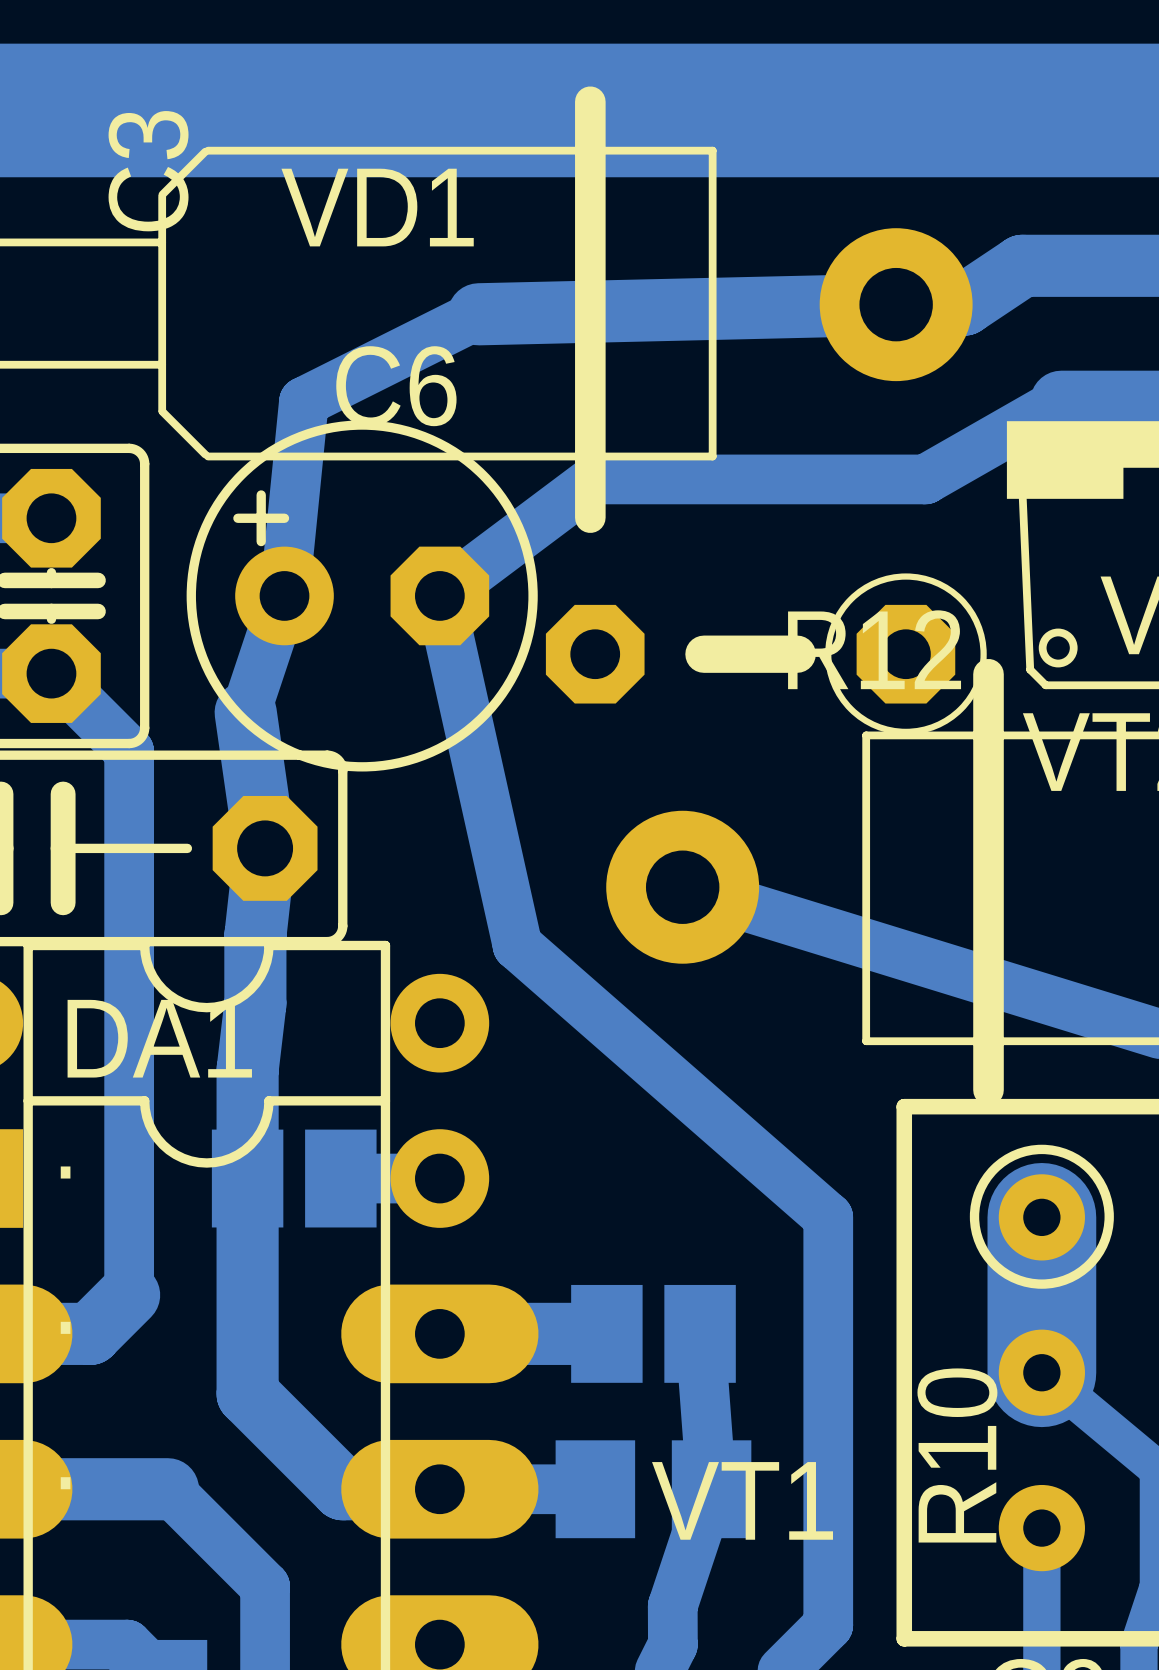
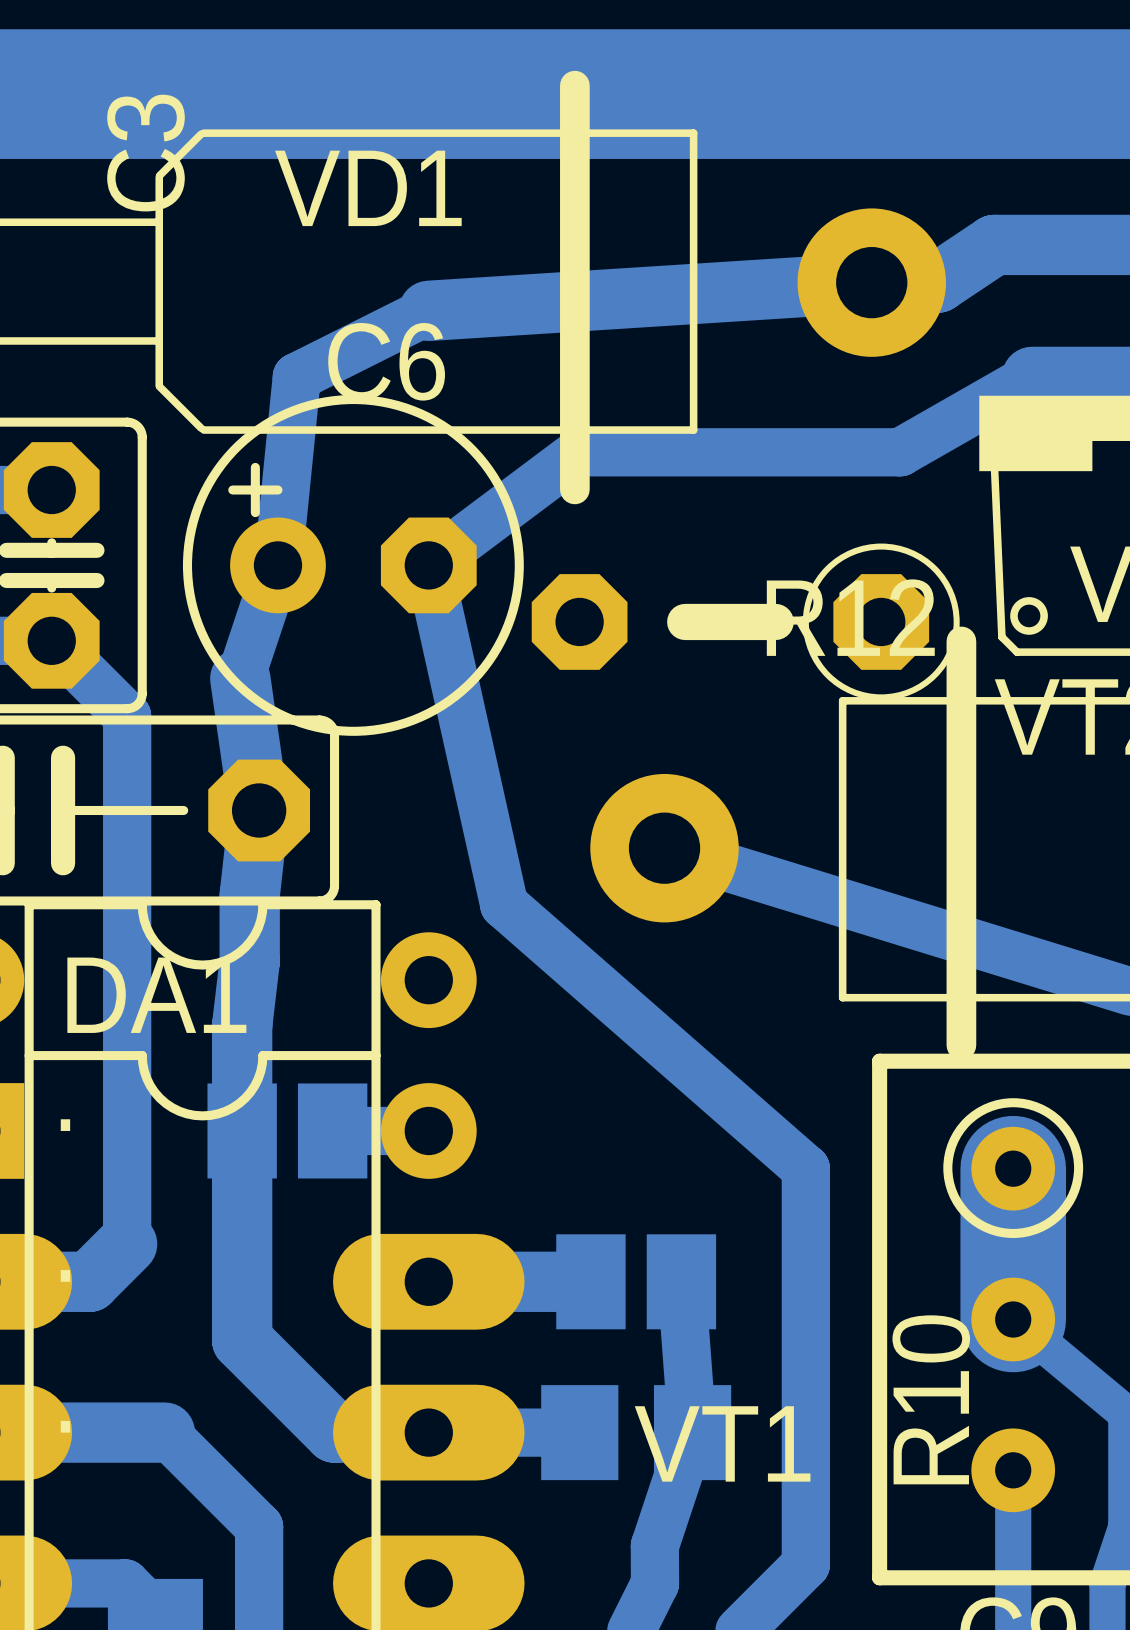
bottom track: (896, 304) (478, 314) (439, 333) -> (871, 282) (428, 310)

